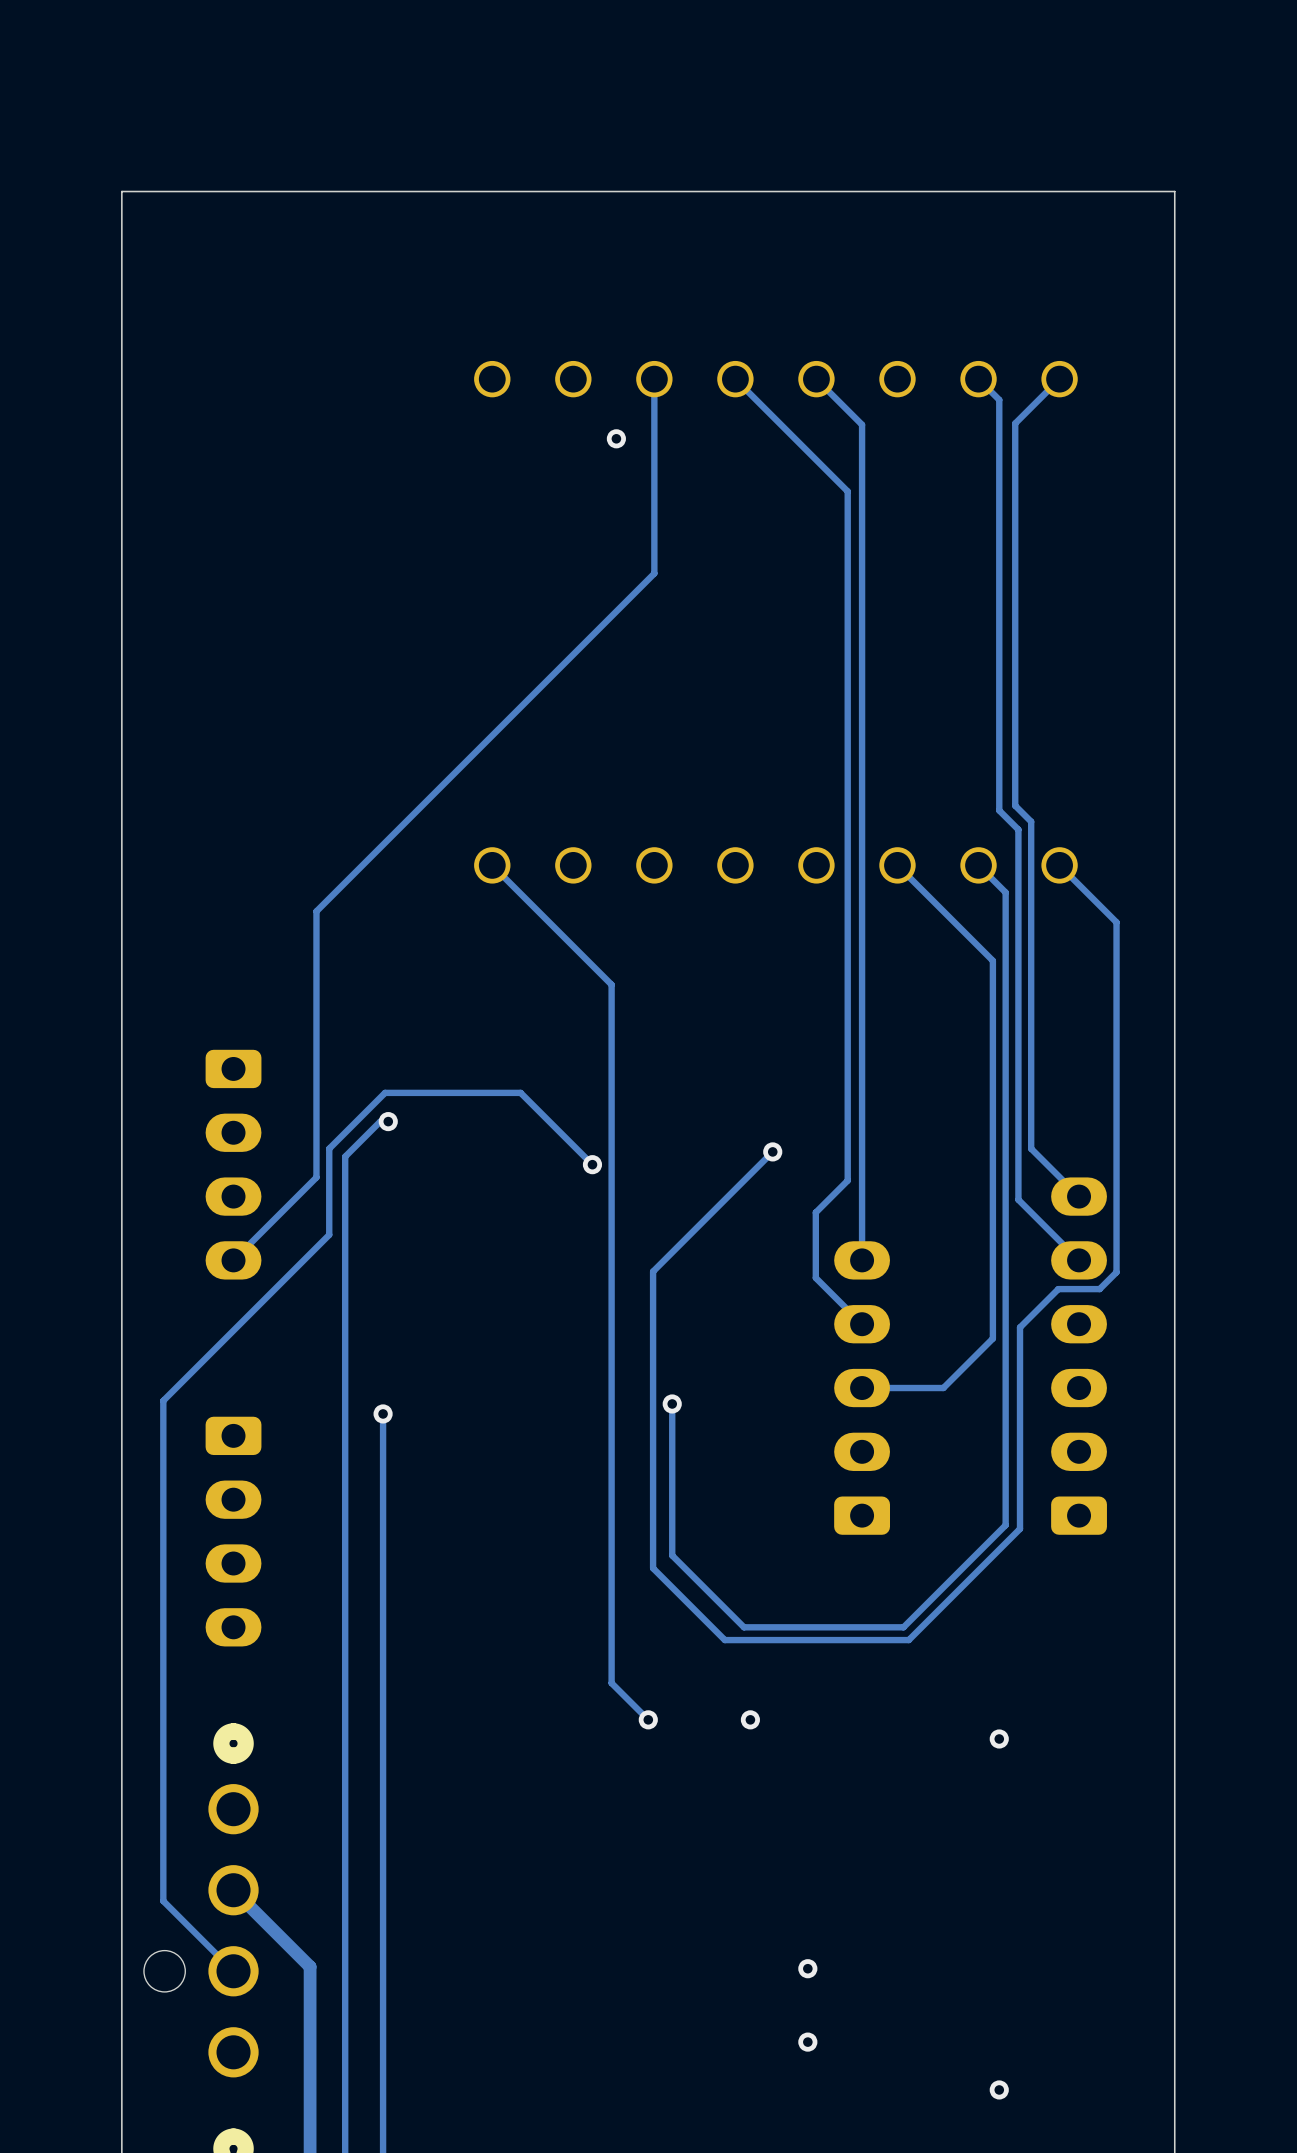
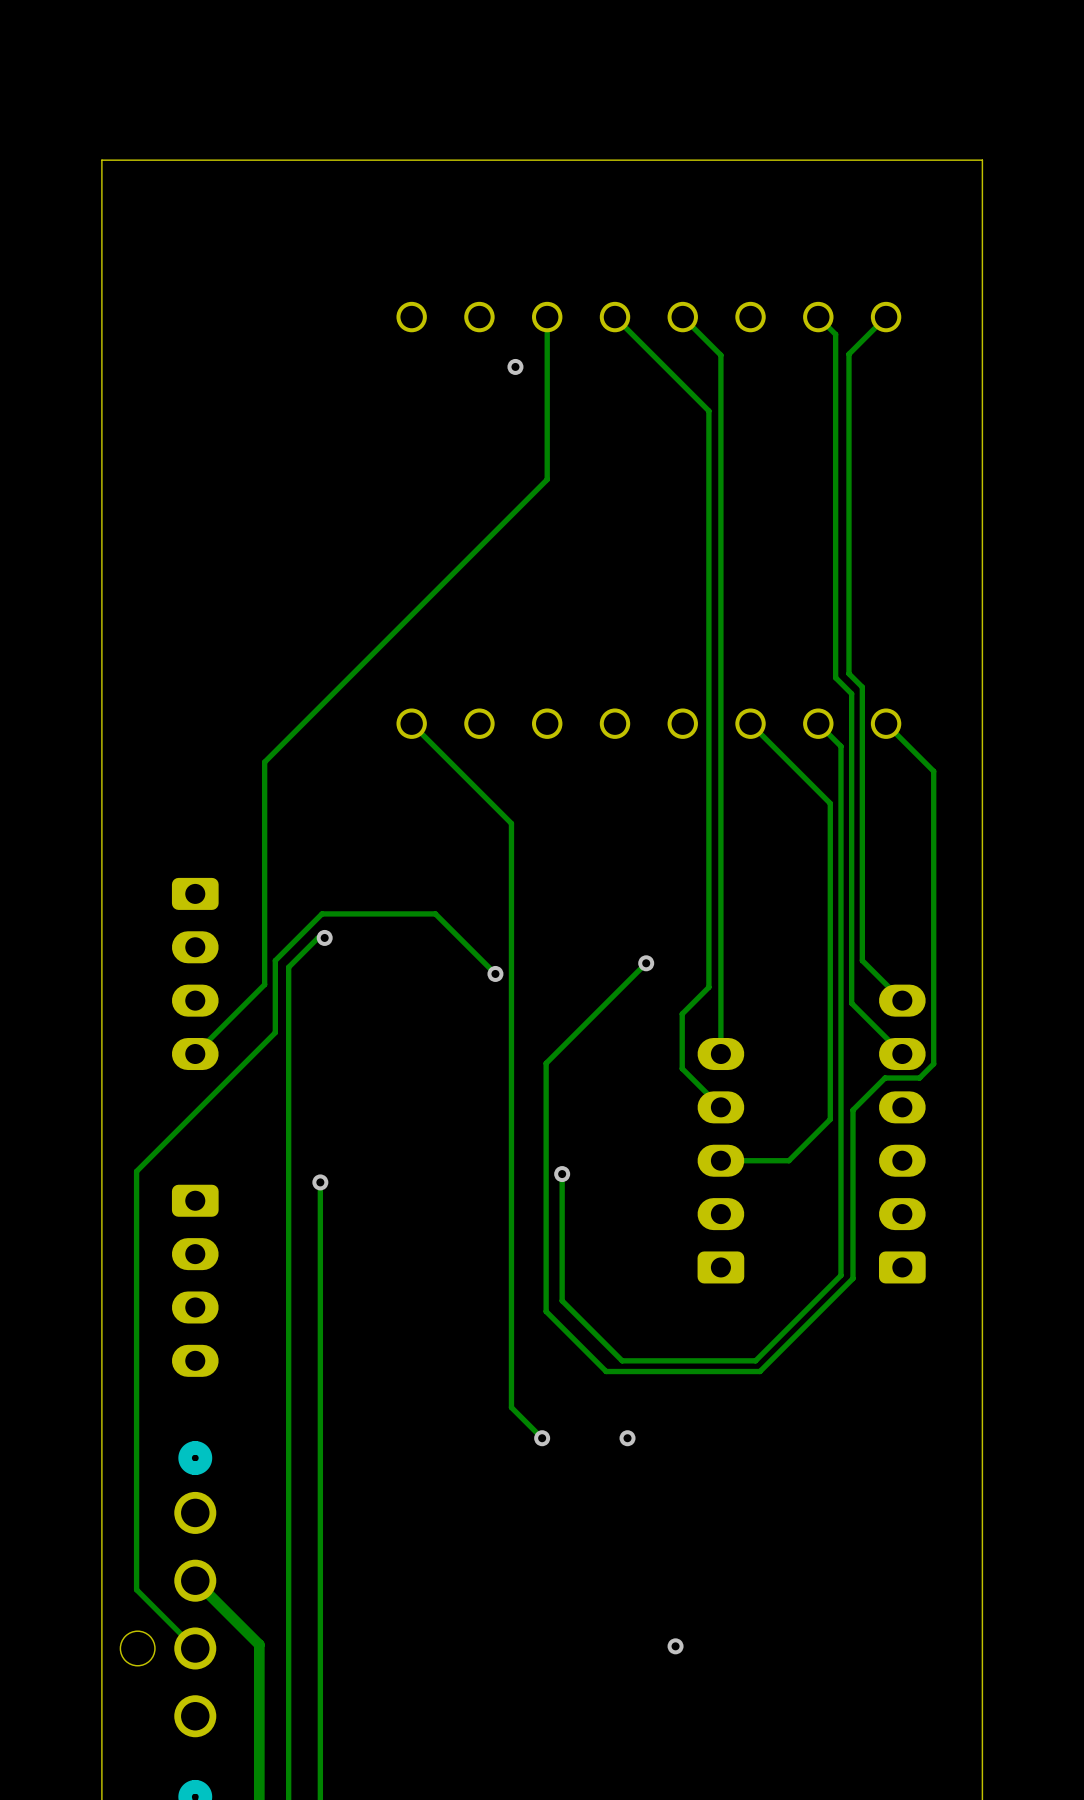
via: (999, 1738) -> none
via: (807, 2042) -> none
via: (999, 2089) -> none

